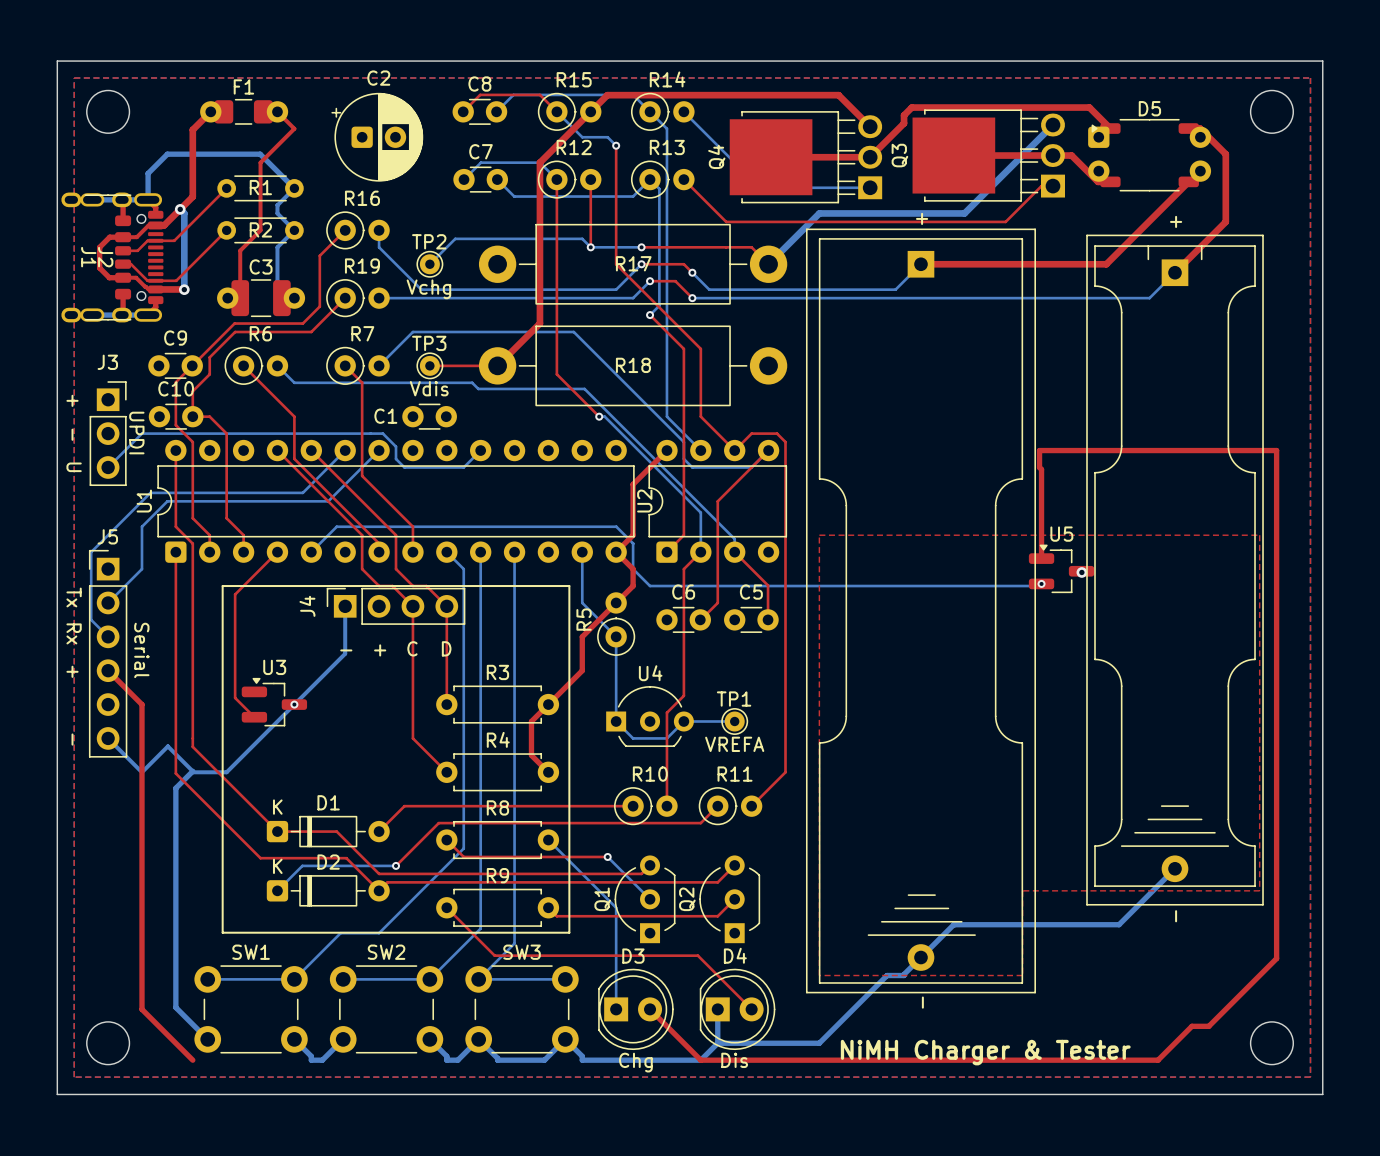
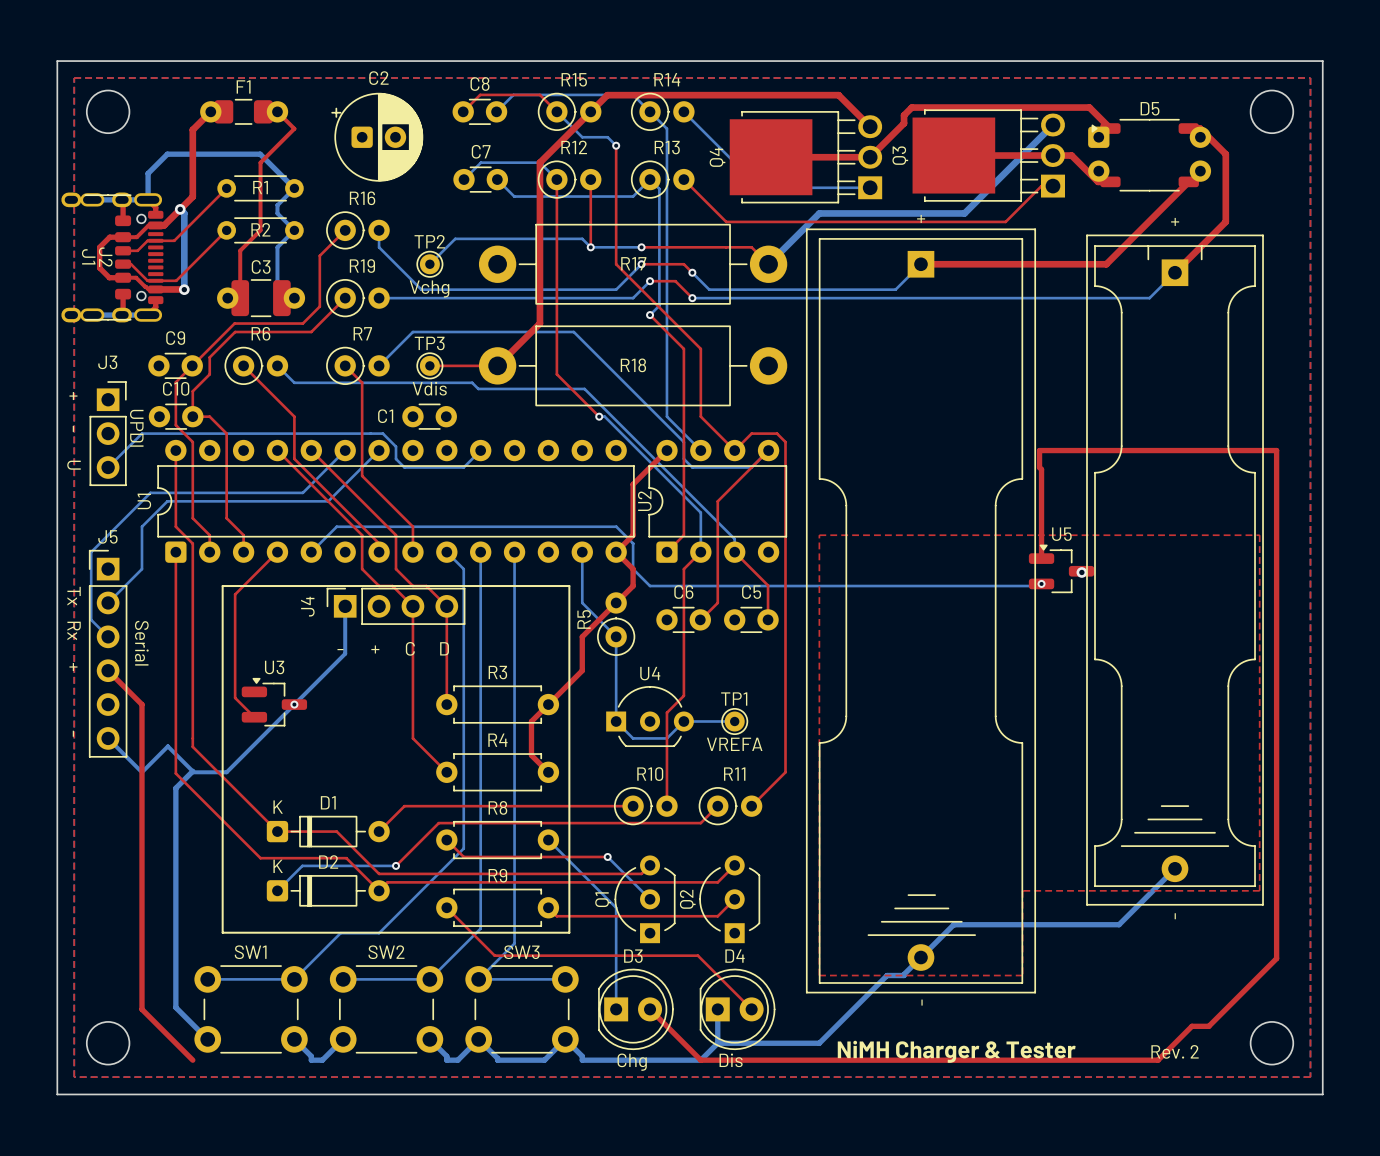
text: none -> Rev. 2 (1175, 1051)

